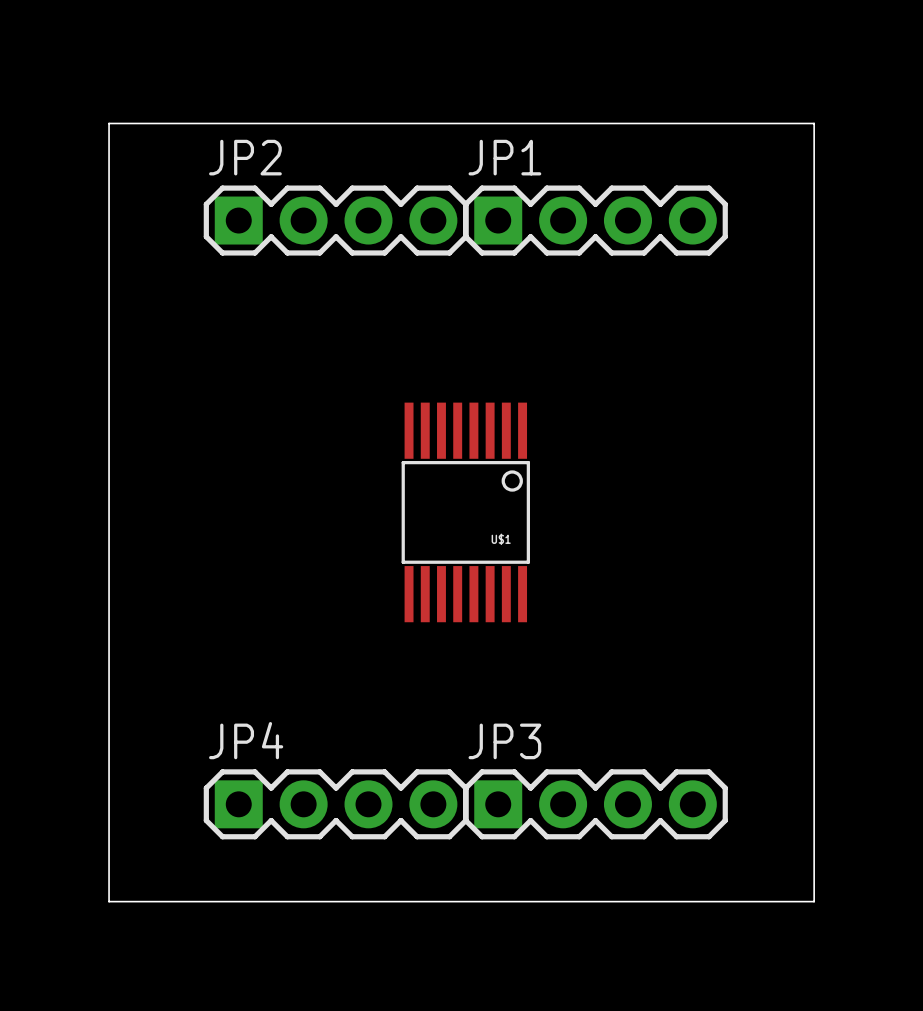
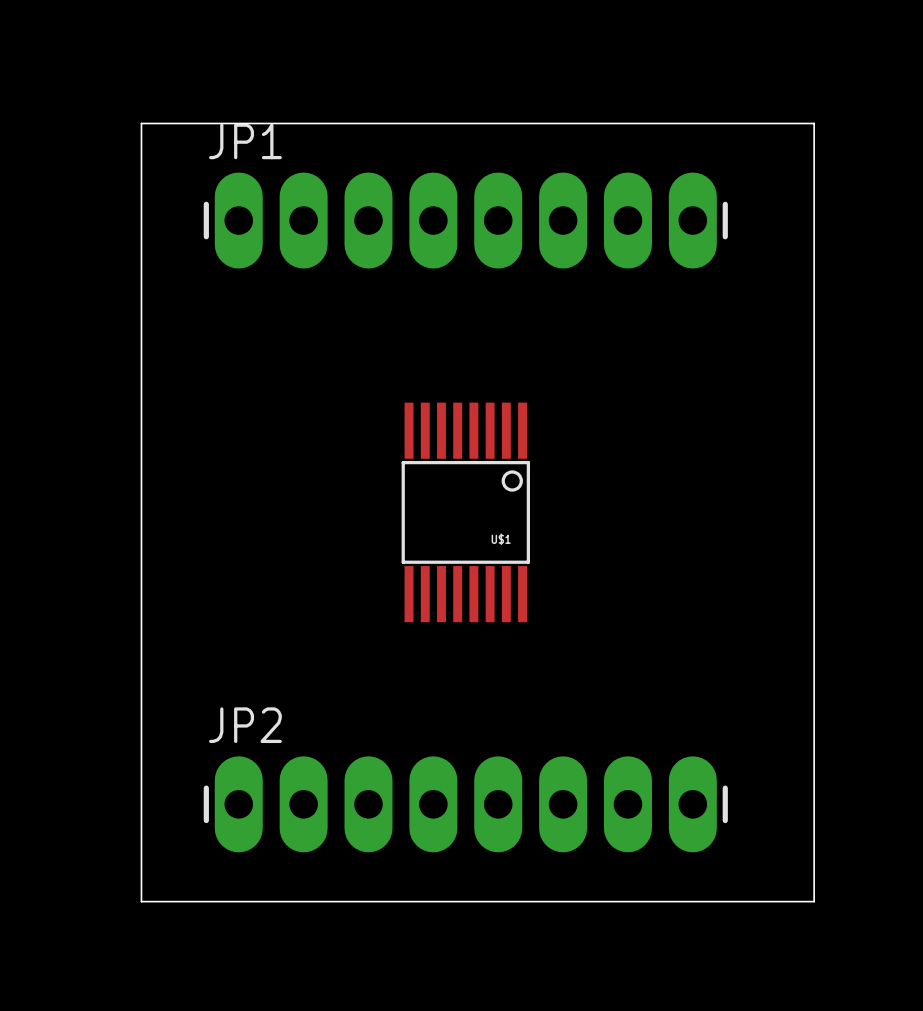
board edge: (141, 123) (109, 123) (109, 901) (141, 901) -> (141, 123) (141, 901)
JP2 name position: JP2 (245, 157) -> JP2 (245, 725)
JP1 name position: JP1 (504, 157) -> JP1 (245, 141)
JP2 footprint: [203, 185, 469, 256] -> [203, 756, 728, 853]
JP1 footprint: [463, 185, 728, 256] -> [203, 172, 728, 269]
JP4: (336, 804) -> none
JP3: (595, 804) -> none

